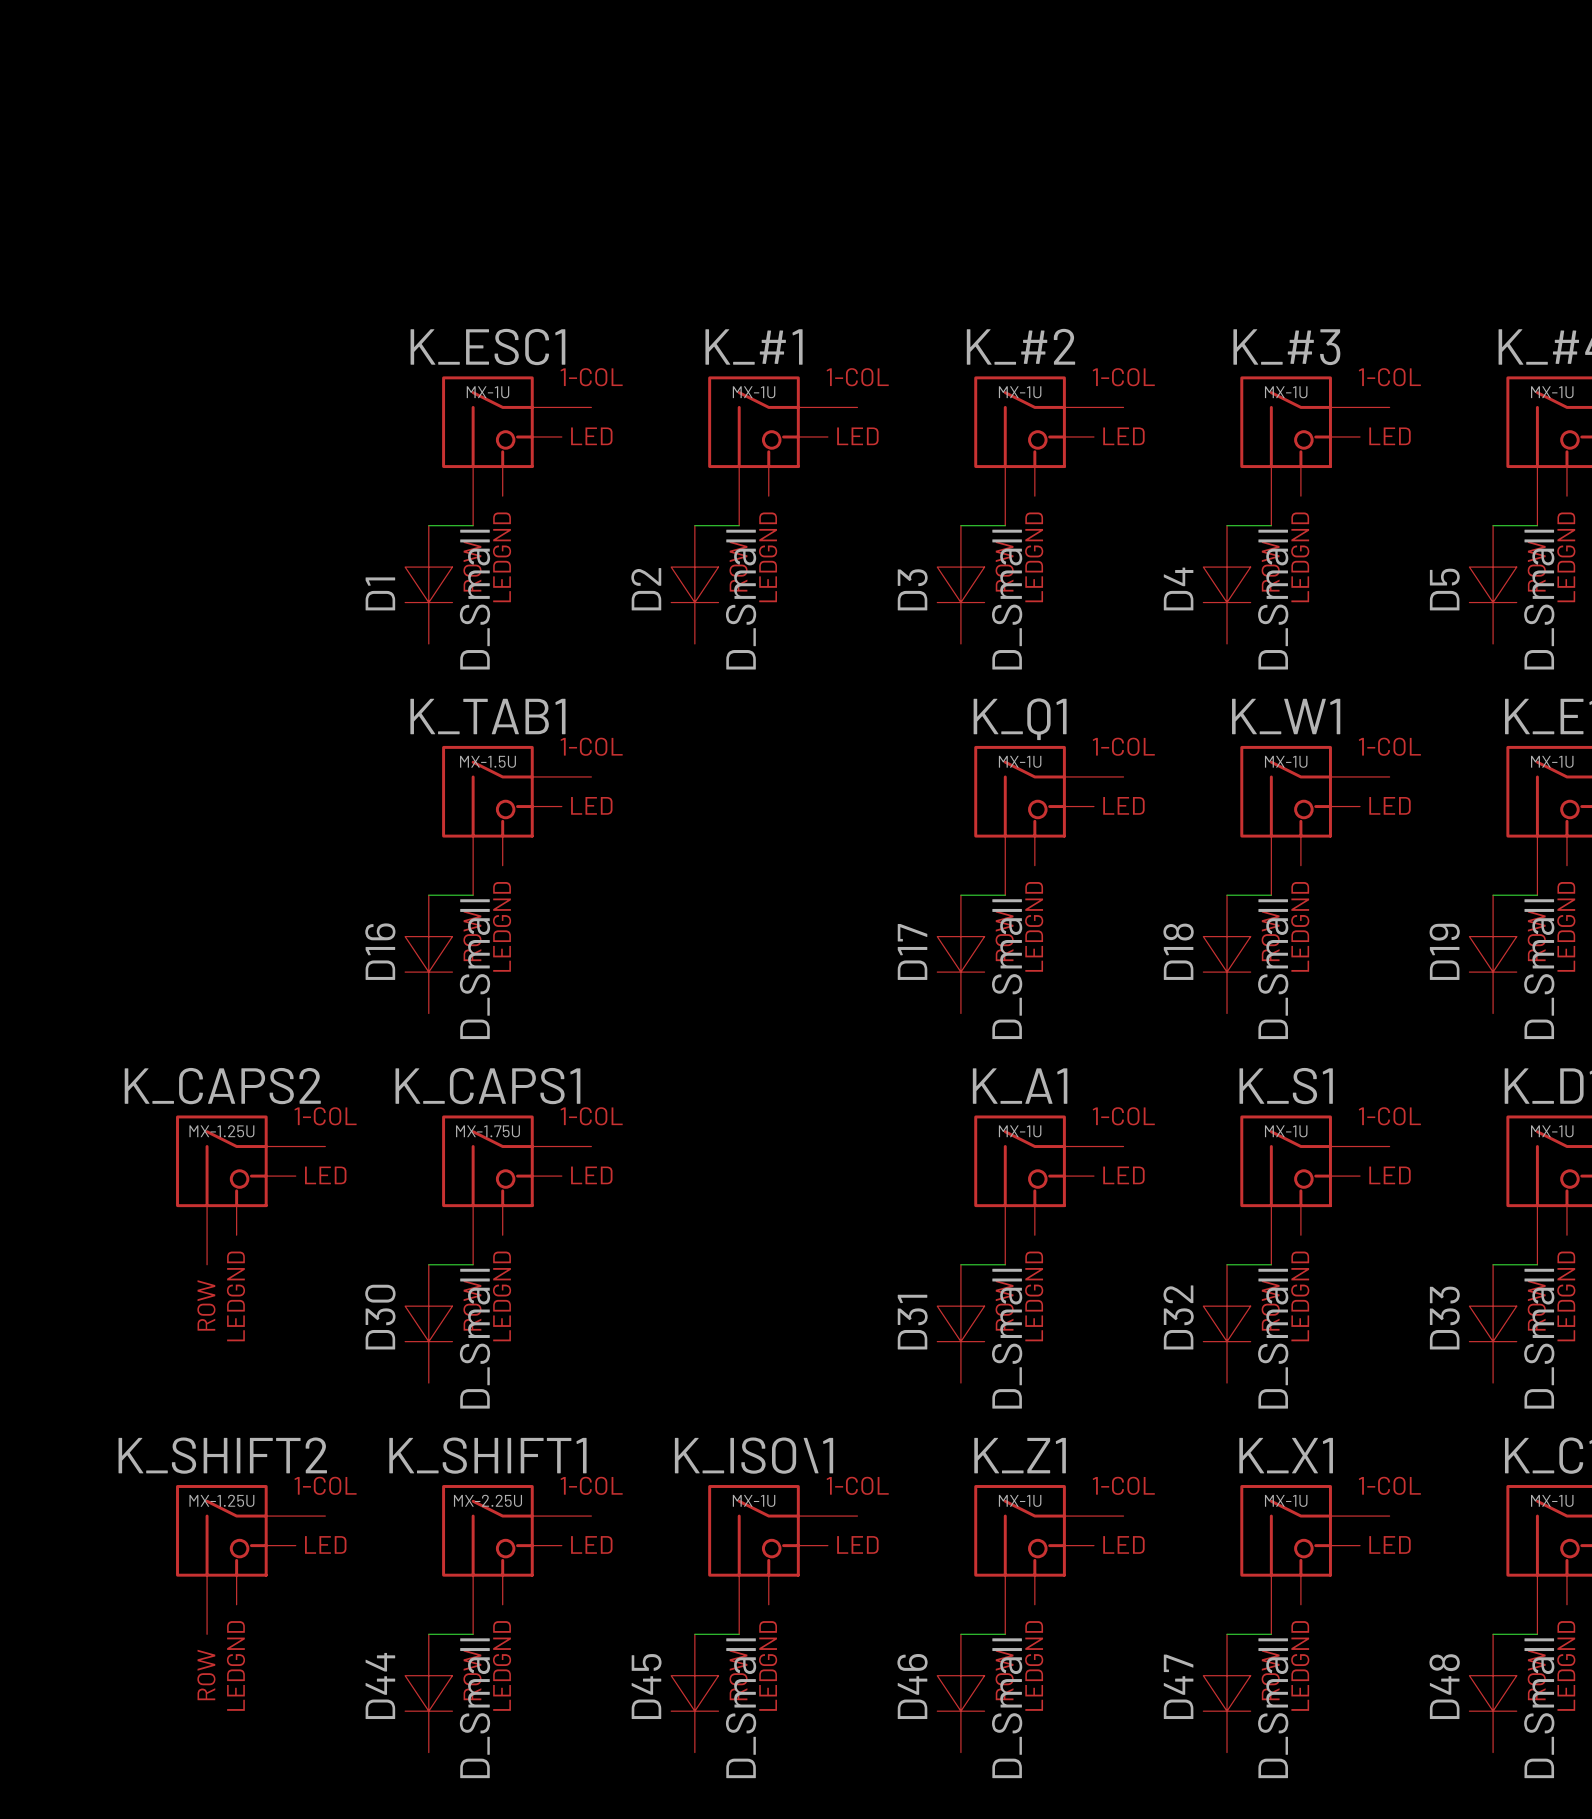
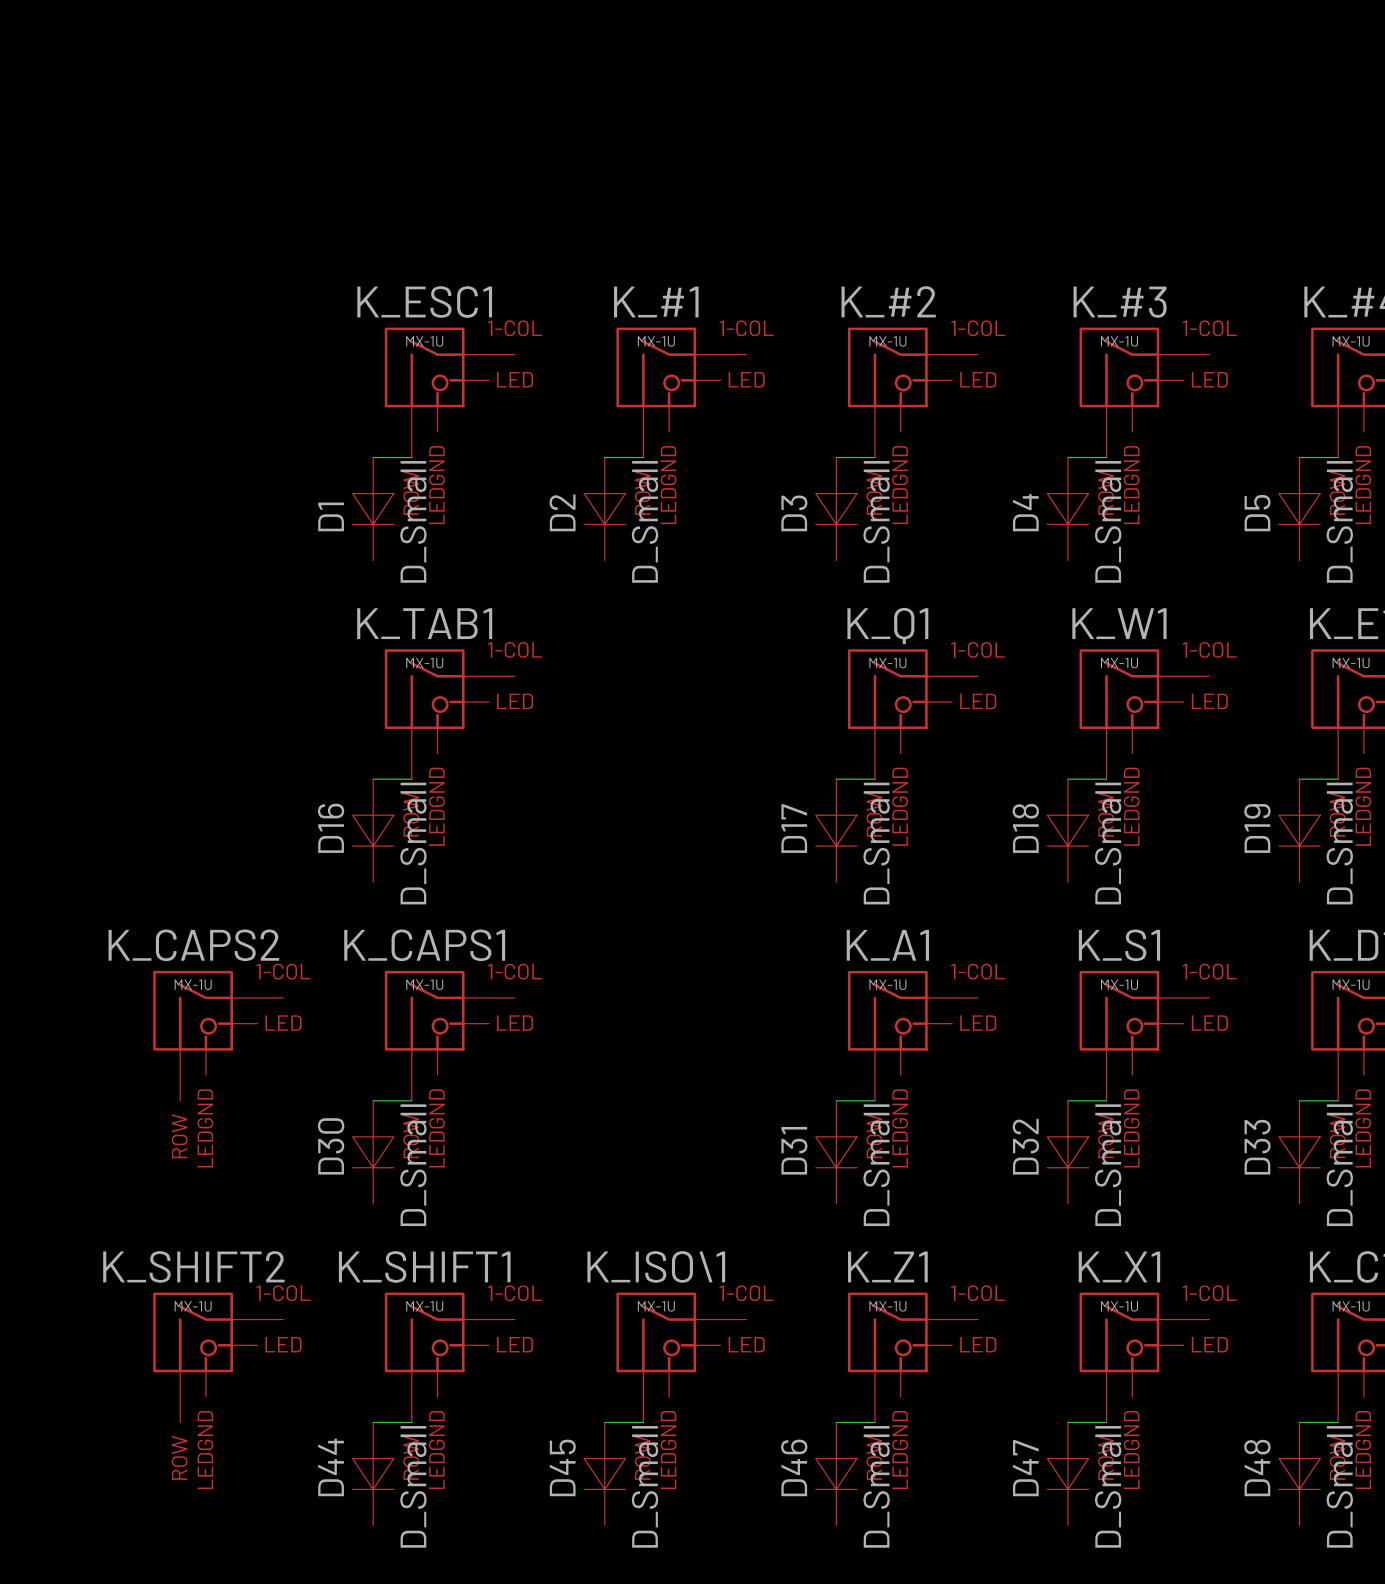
K_TAB1 value: MX-1.5U (487, 761) -> MX-1U (424, 663)
K_CAPS2 value: MX-1.25U (221, 1131) -> MX-1U (193, 984)
K_CAPS1 value: MX-1.75U (487, 1131) -> MX-1U (424, 984)
K_SHIFT2 value: MX-1.25U (221, 1500) -> MX-1U (193, 1306)
K_SHIFT1 value: MX-2.25U (487, 1500) -> MX-1U (424, 1306)

